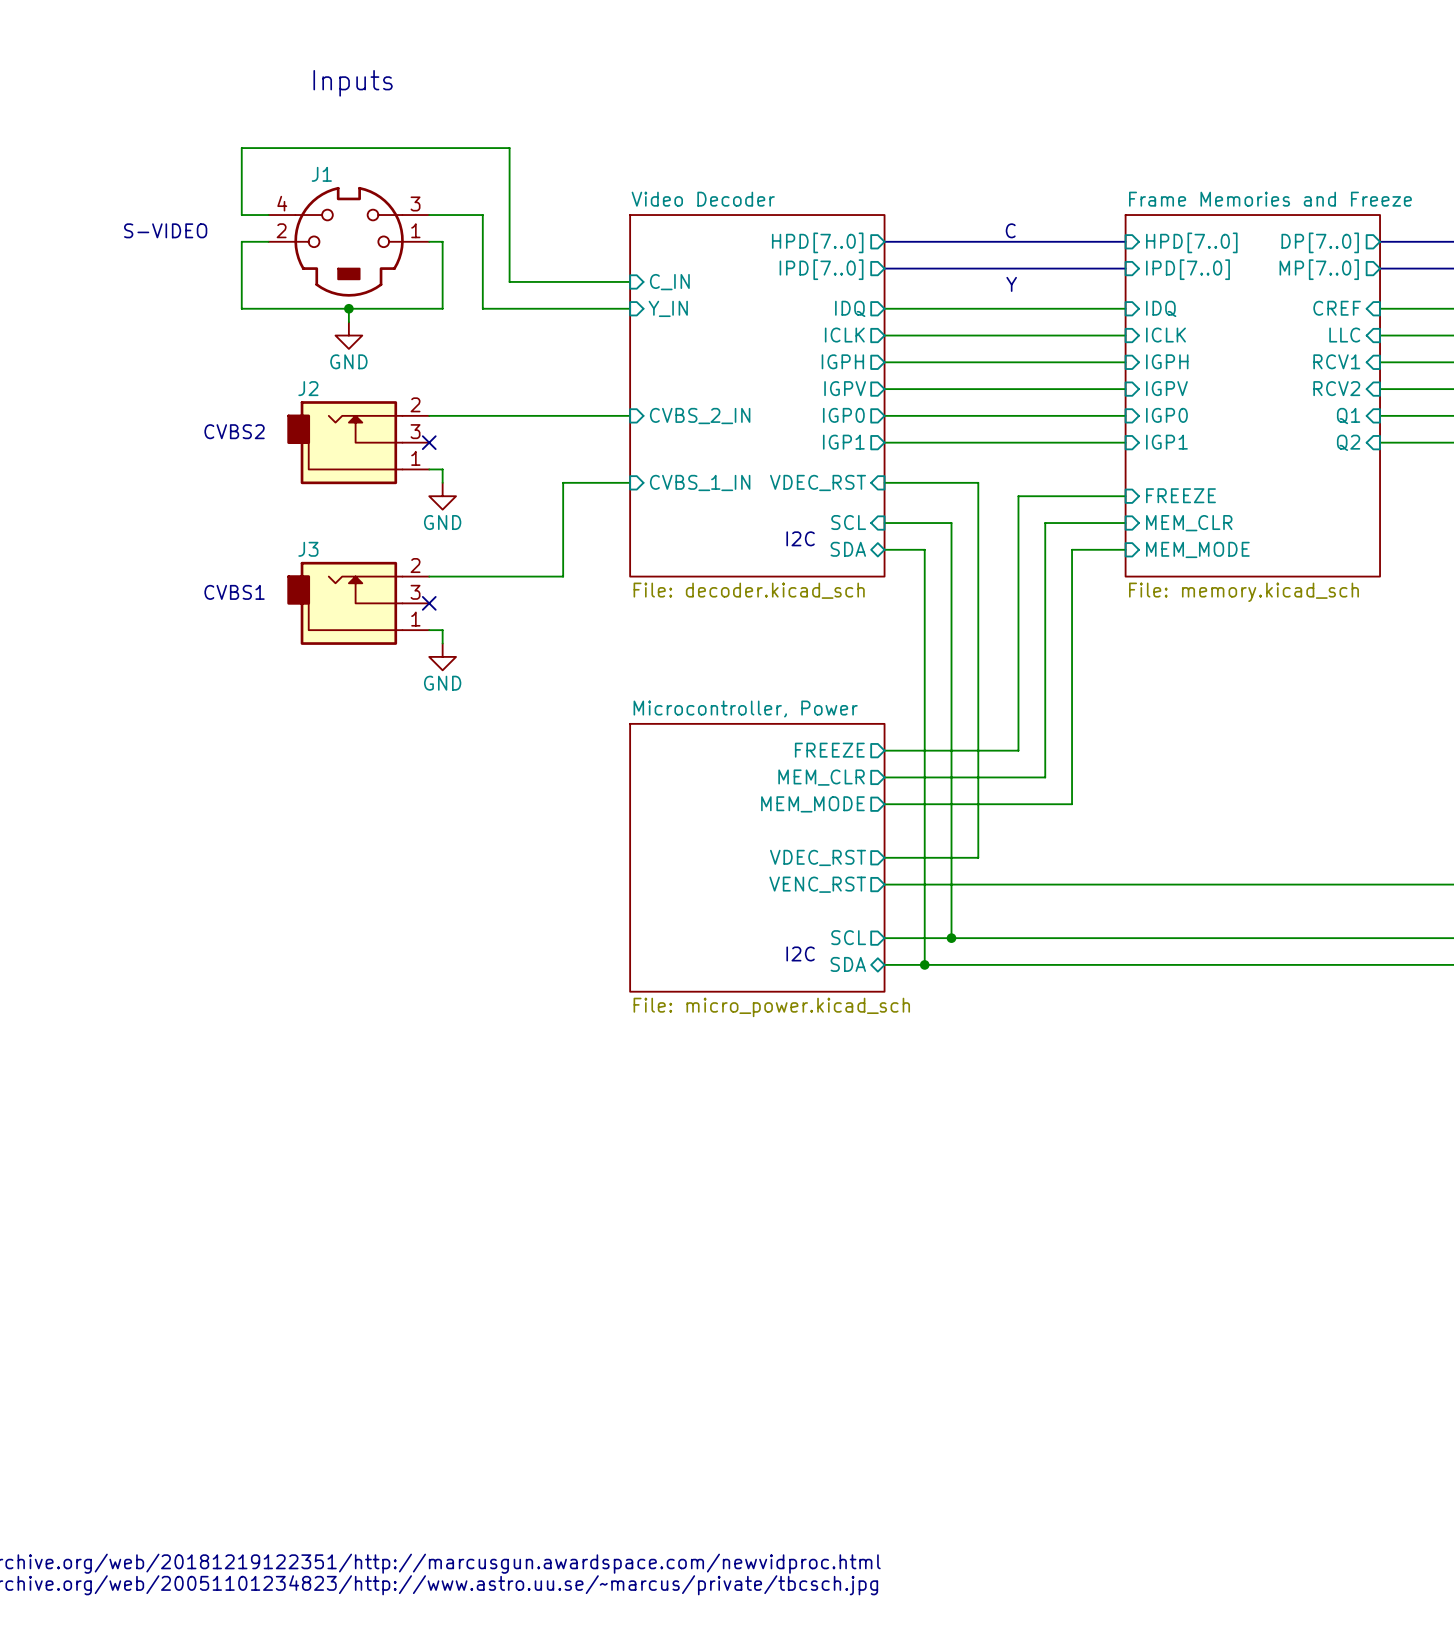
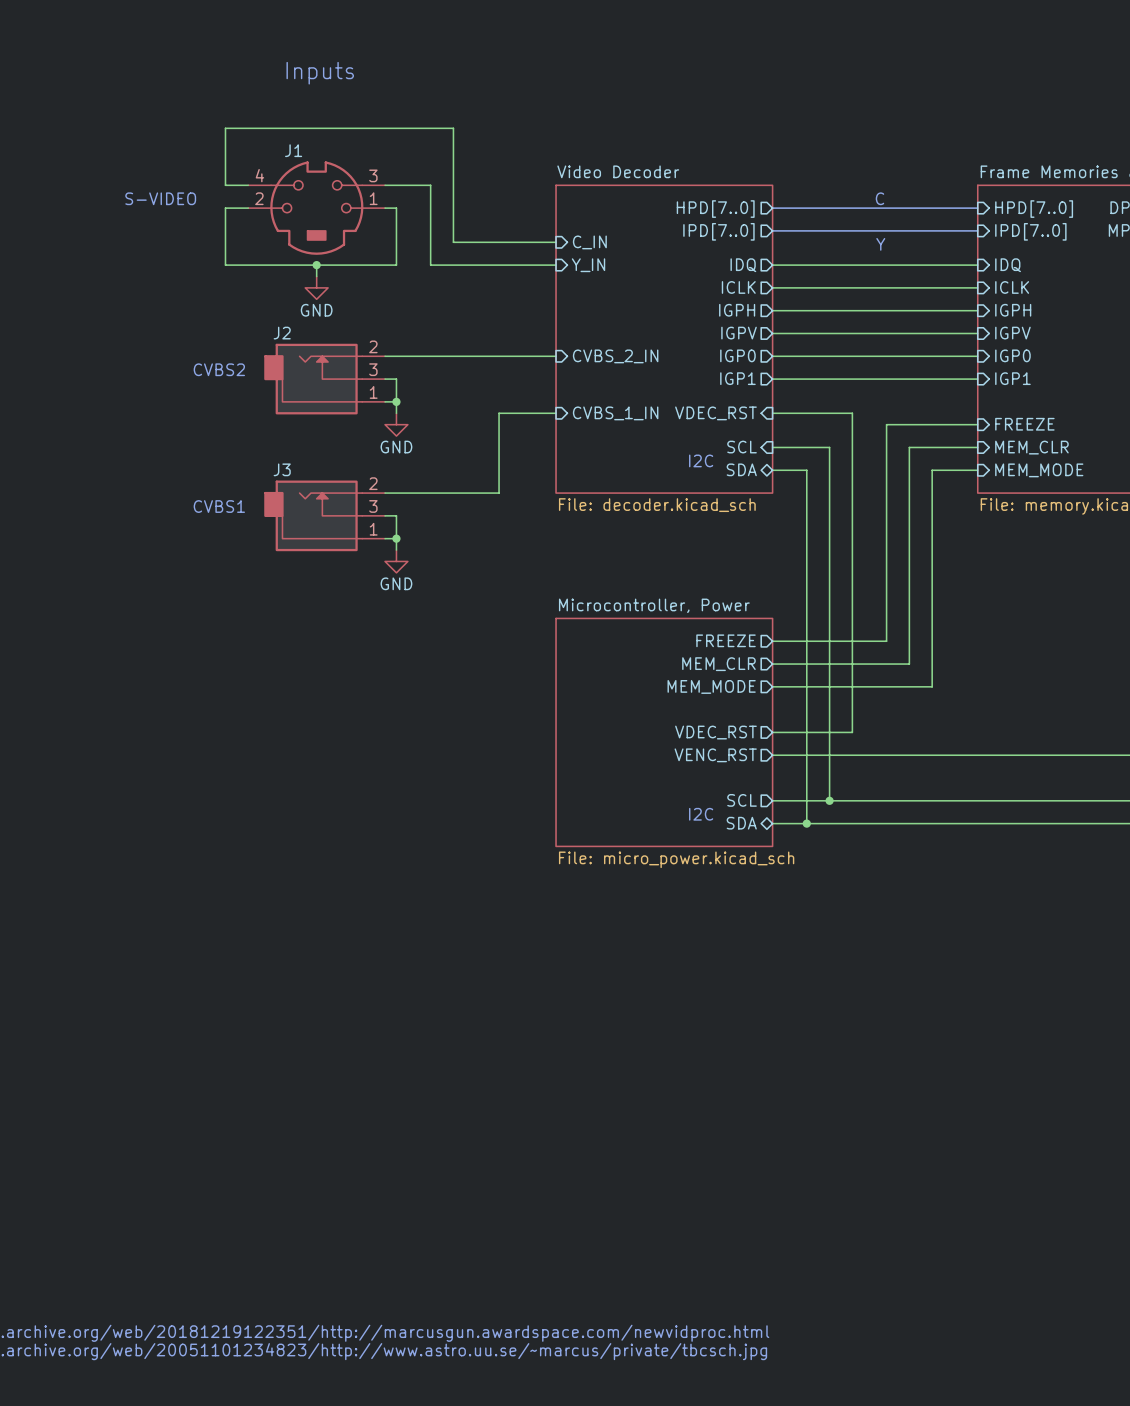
wire: none -> (385, 379) (396, 379) (396, 401)
no-connect mark: (429, 442) -> none
junction: none -> (396, 401)
wire: none -> (385, 515) (396, 515) (396, 538)
no-connect mark: (429, 603) -> none
junction: none -> (396, 538)

